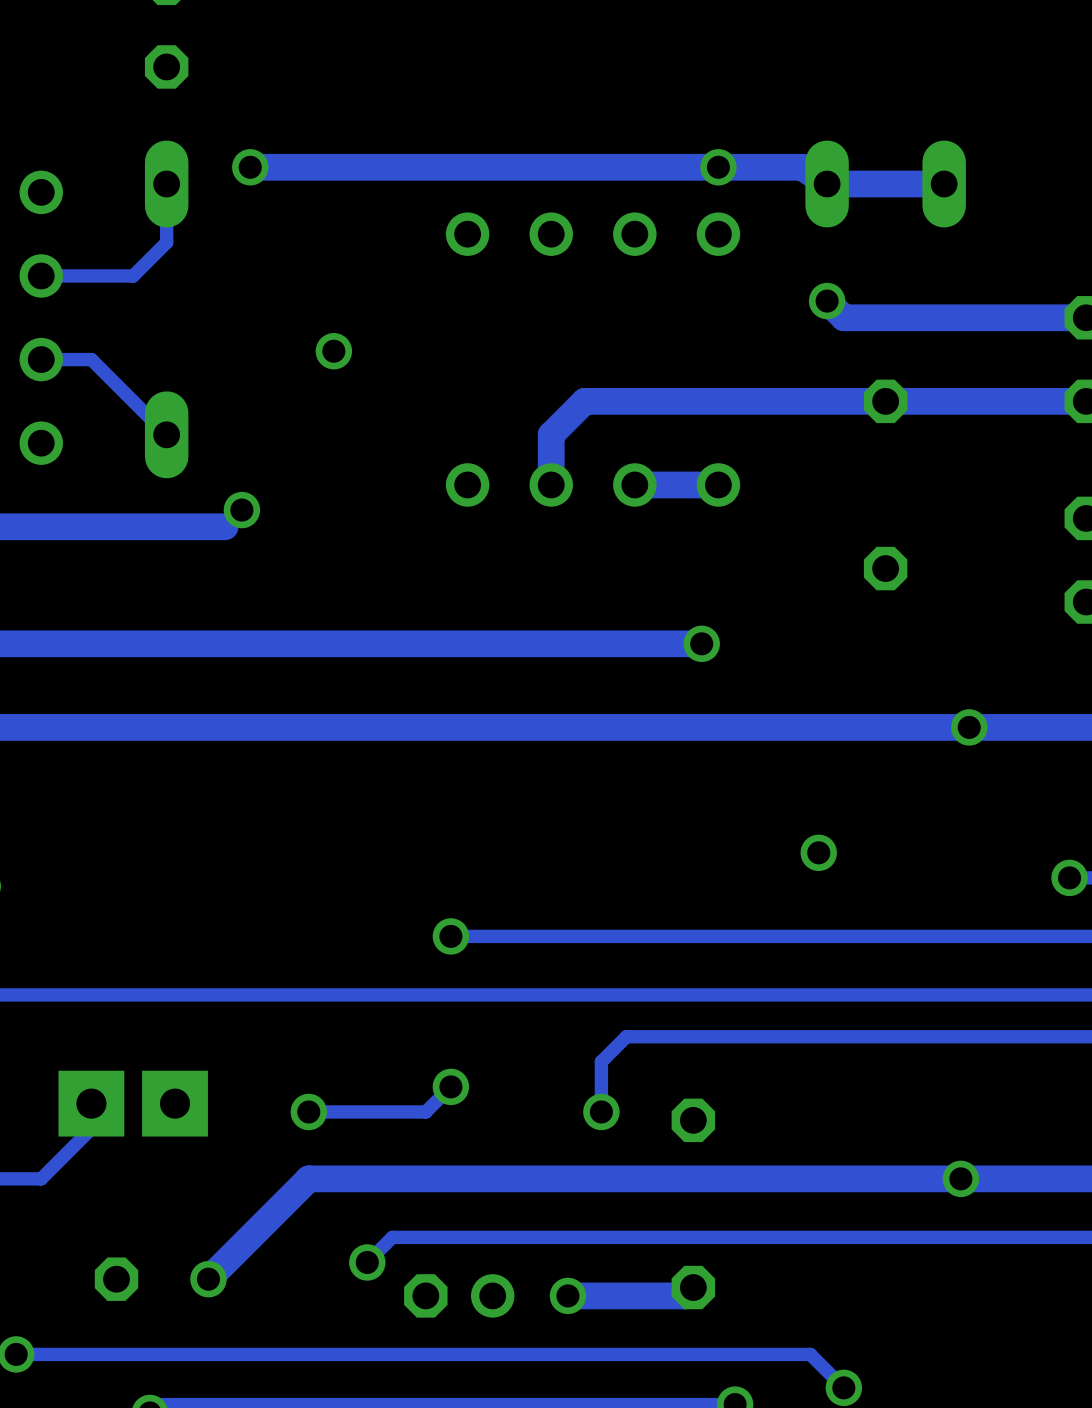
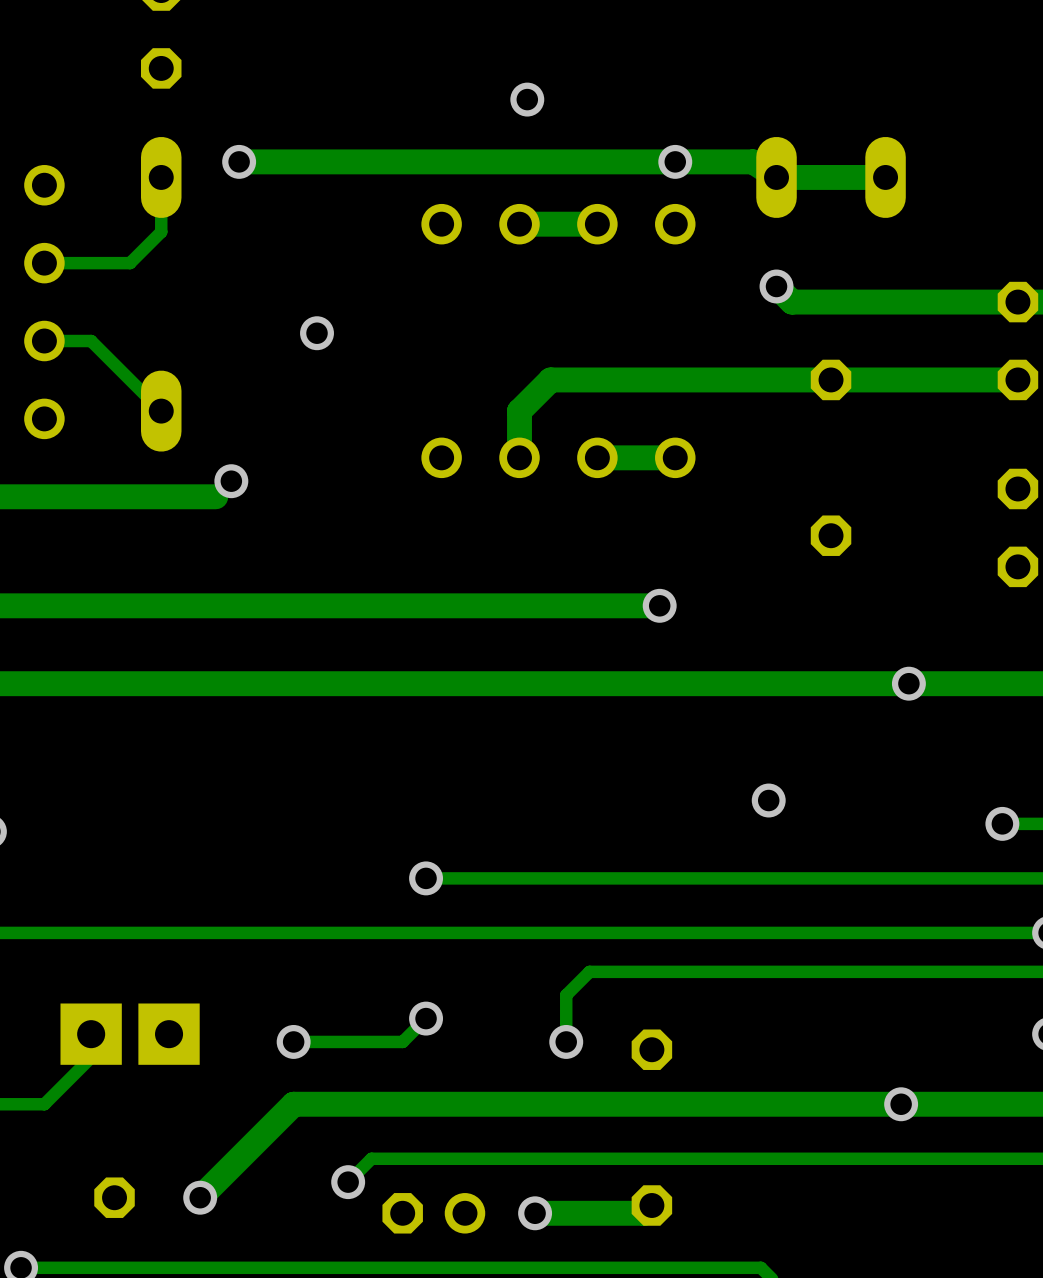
via: none -> (527, 99)
track: none -> (597, 224) (519, 224)

